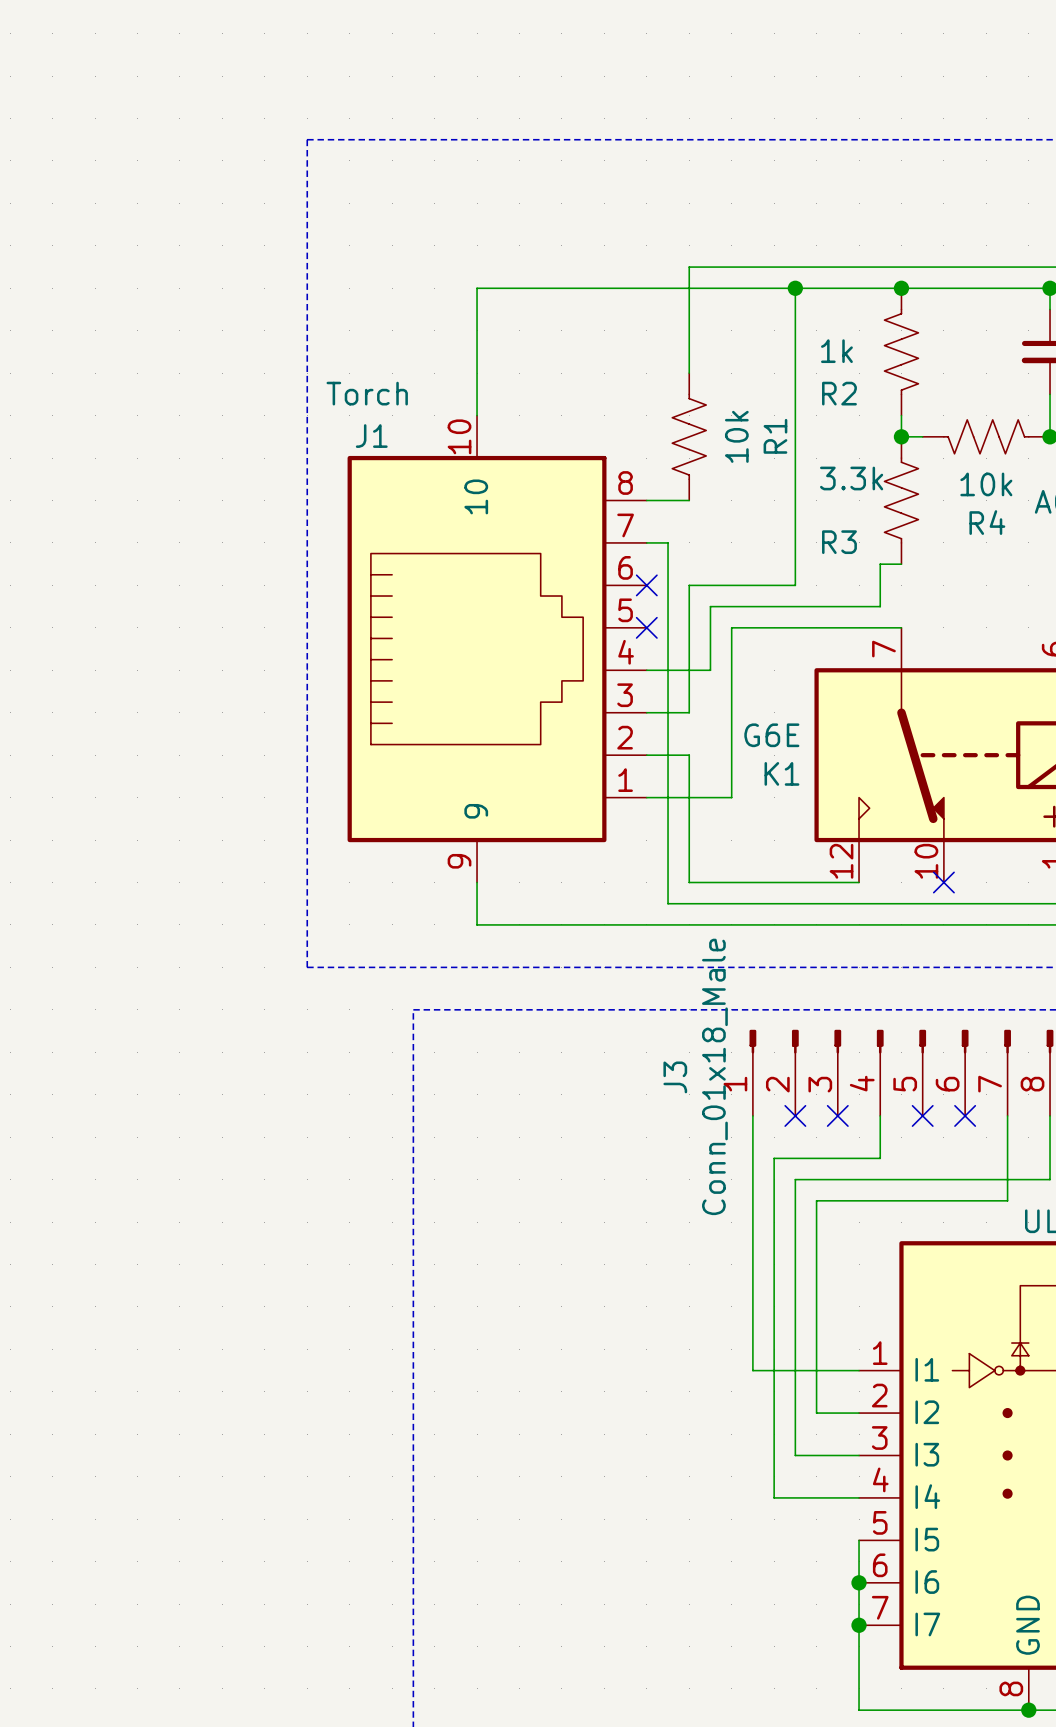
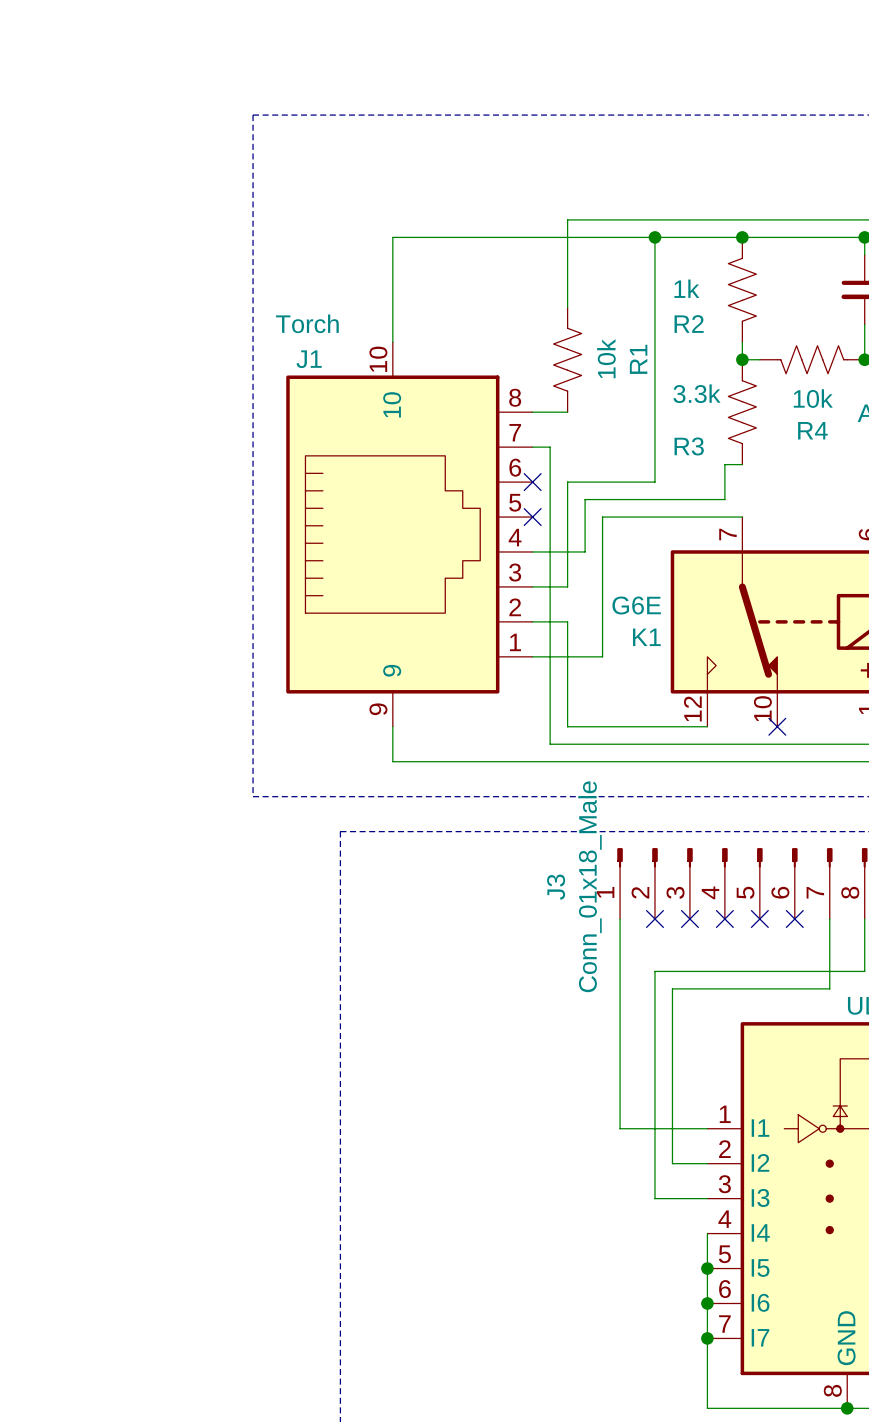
wire: (880, 1115) (880, 1158) (774, 1158) (774, 1497) (859, 1497) -> (707, 1268) (707, 1233)
no-connect mark: none -> (724, 919)
junction: none -> (707, 1268)

